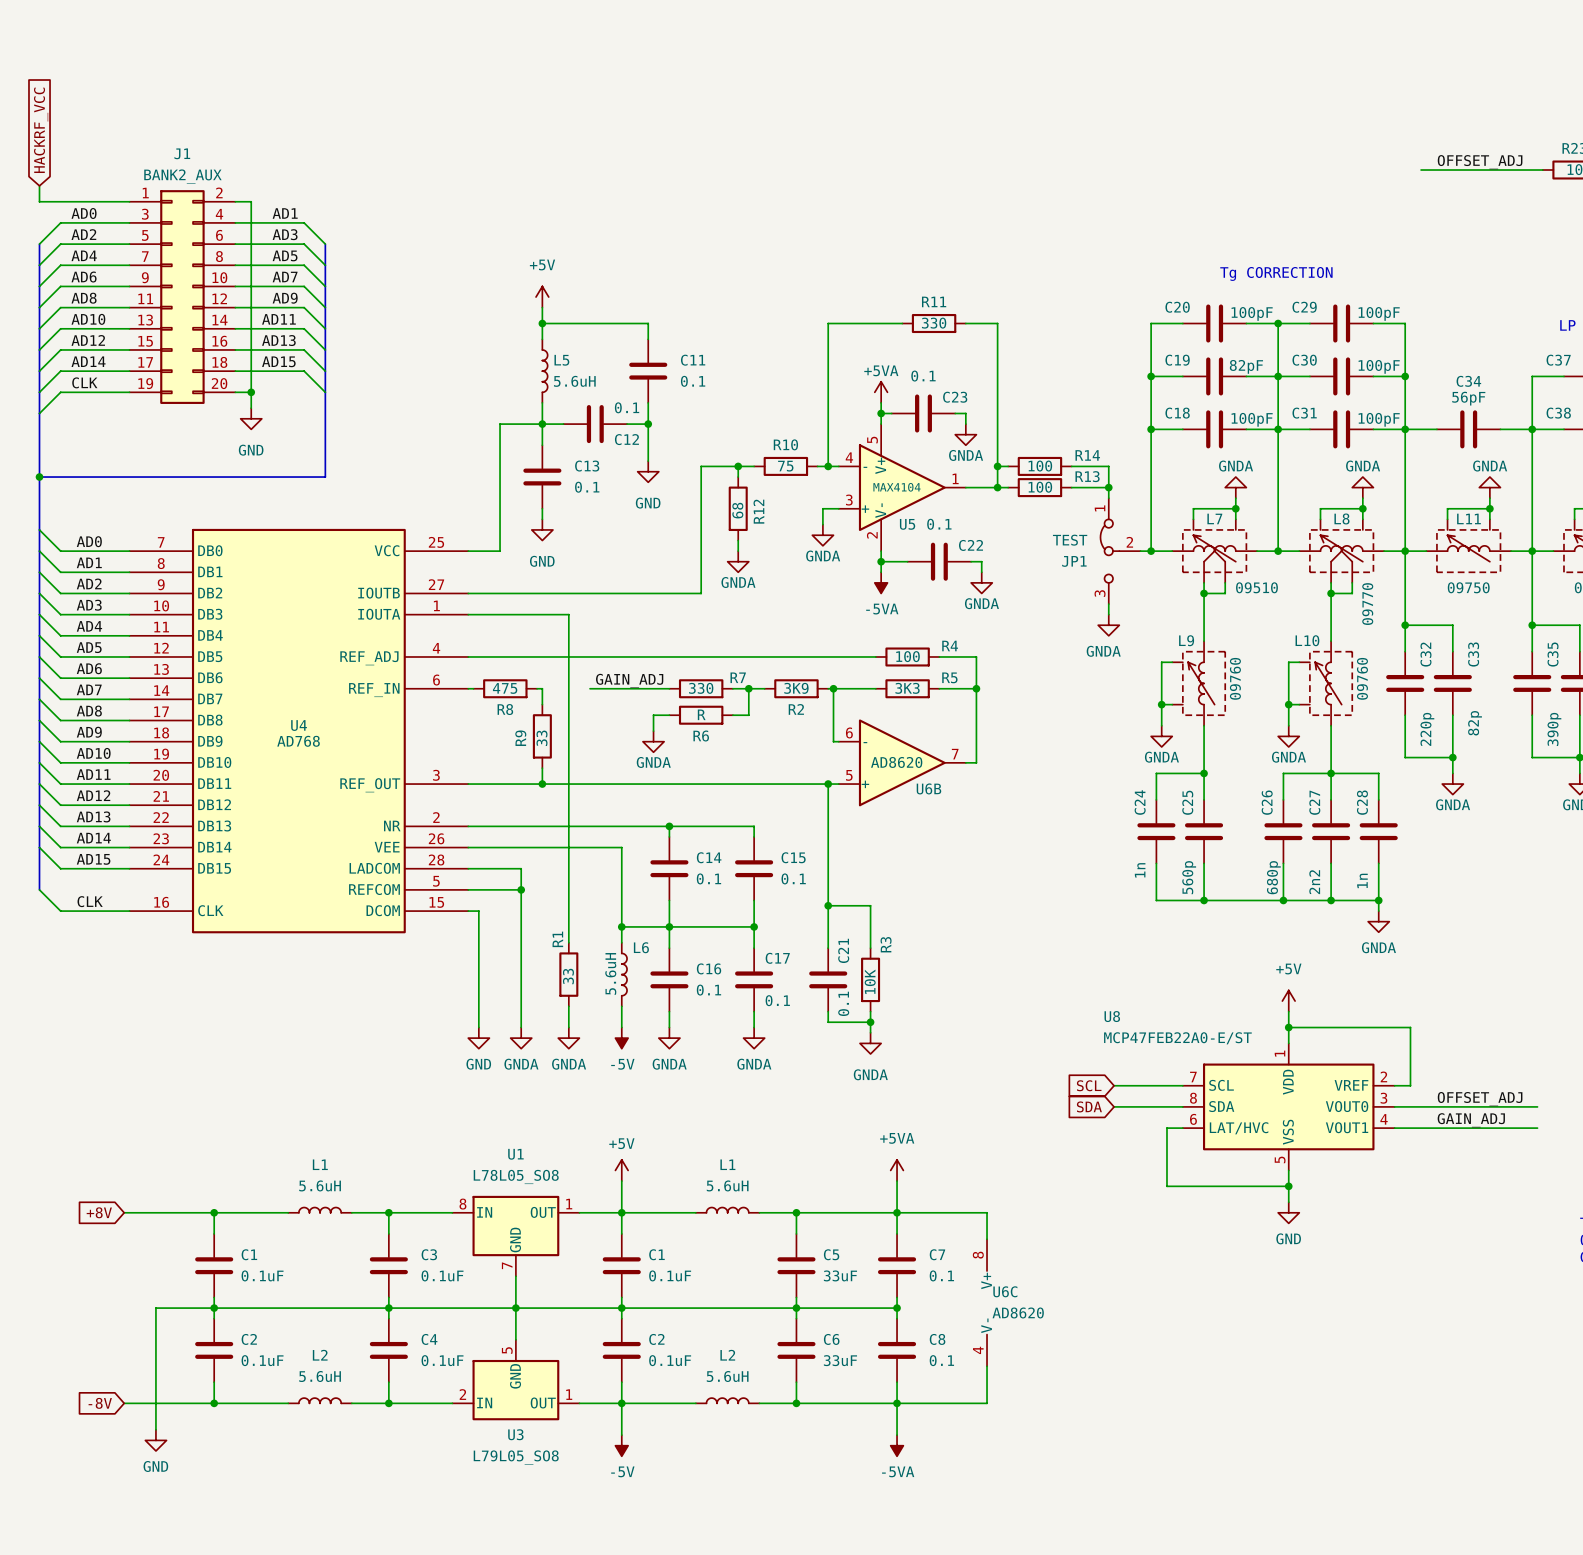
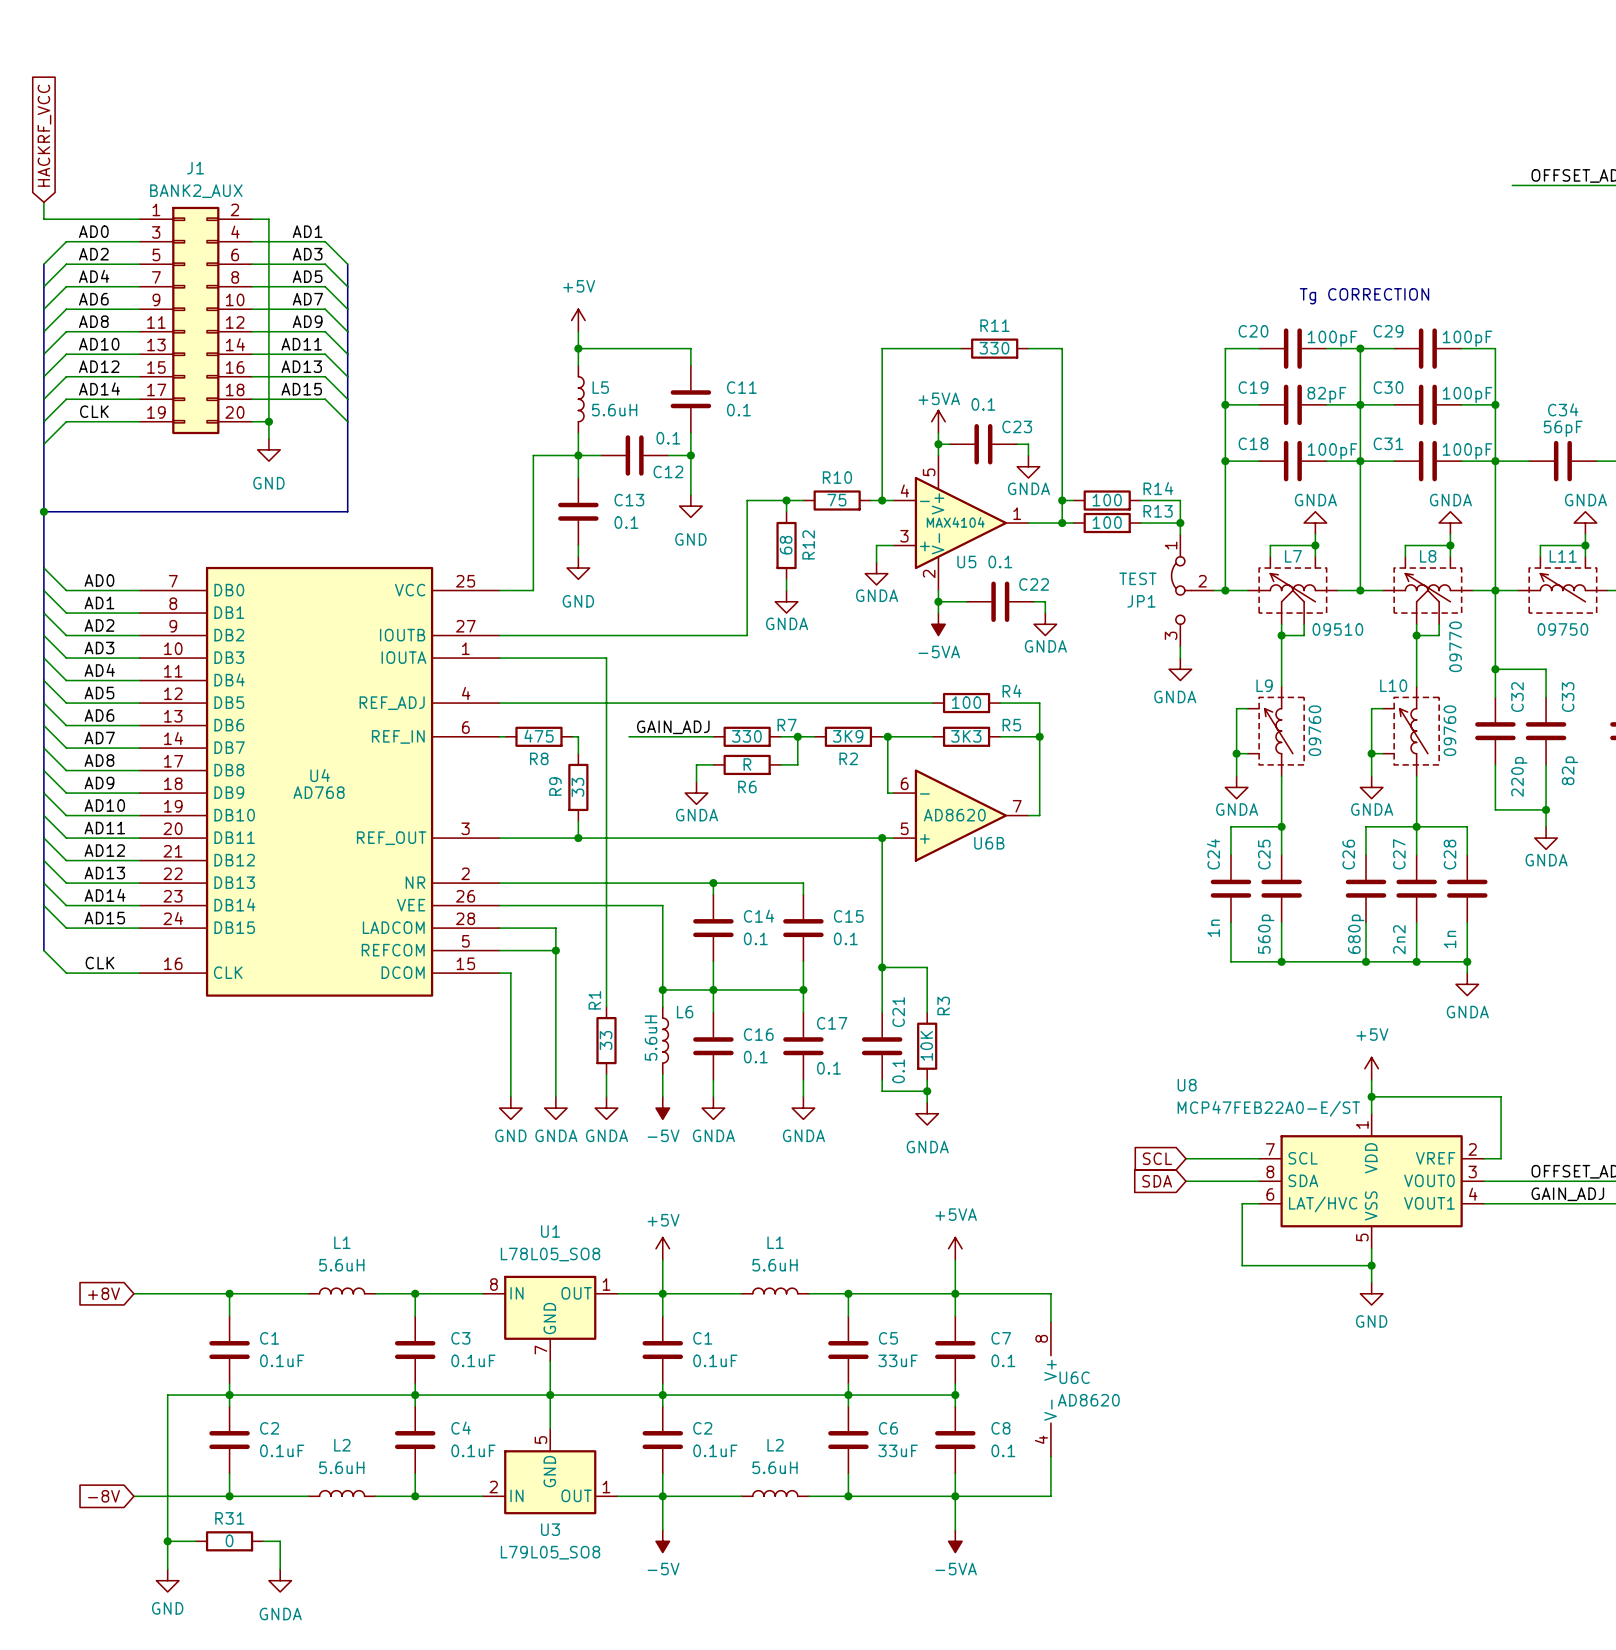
wire: none -> (167, 1524) (167, 1569)
power symbol position: GND (155, 1440) -> GND (167, 1580)
wire: none -> (167, 1541) (195, 1541)
junction: none -> (167, 1541)
R31: none -> 0 (229, 1541)
wire: none -> (263, 1541) (280, 1541) (280, 1569)
power symbol: none -> GNDA (280, 1580)

